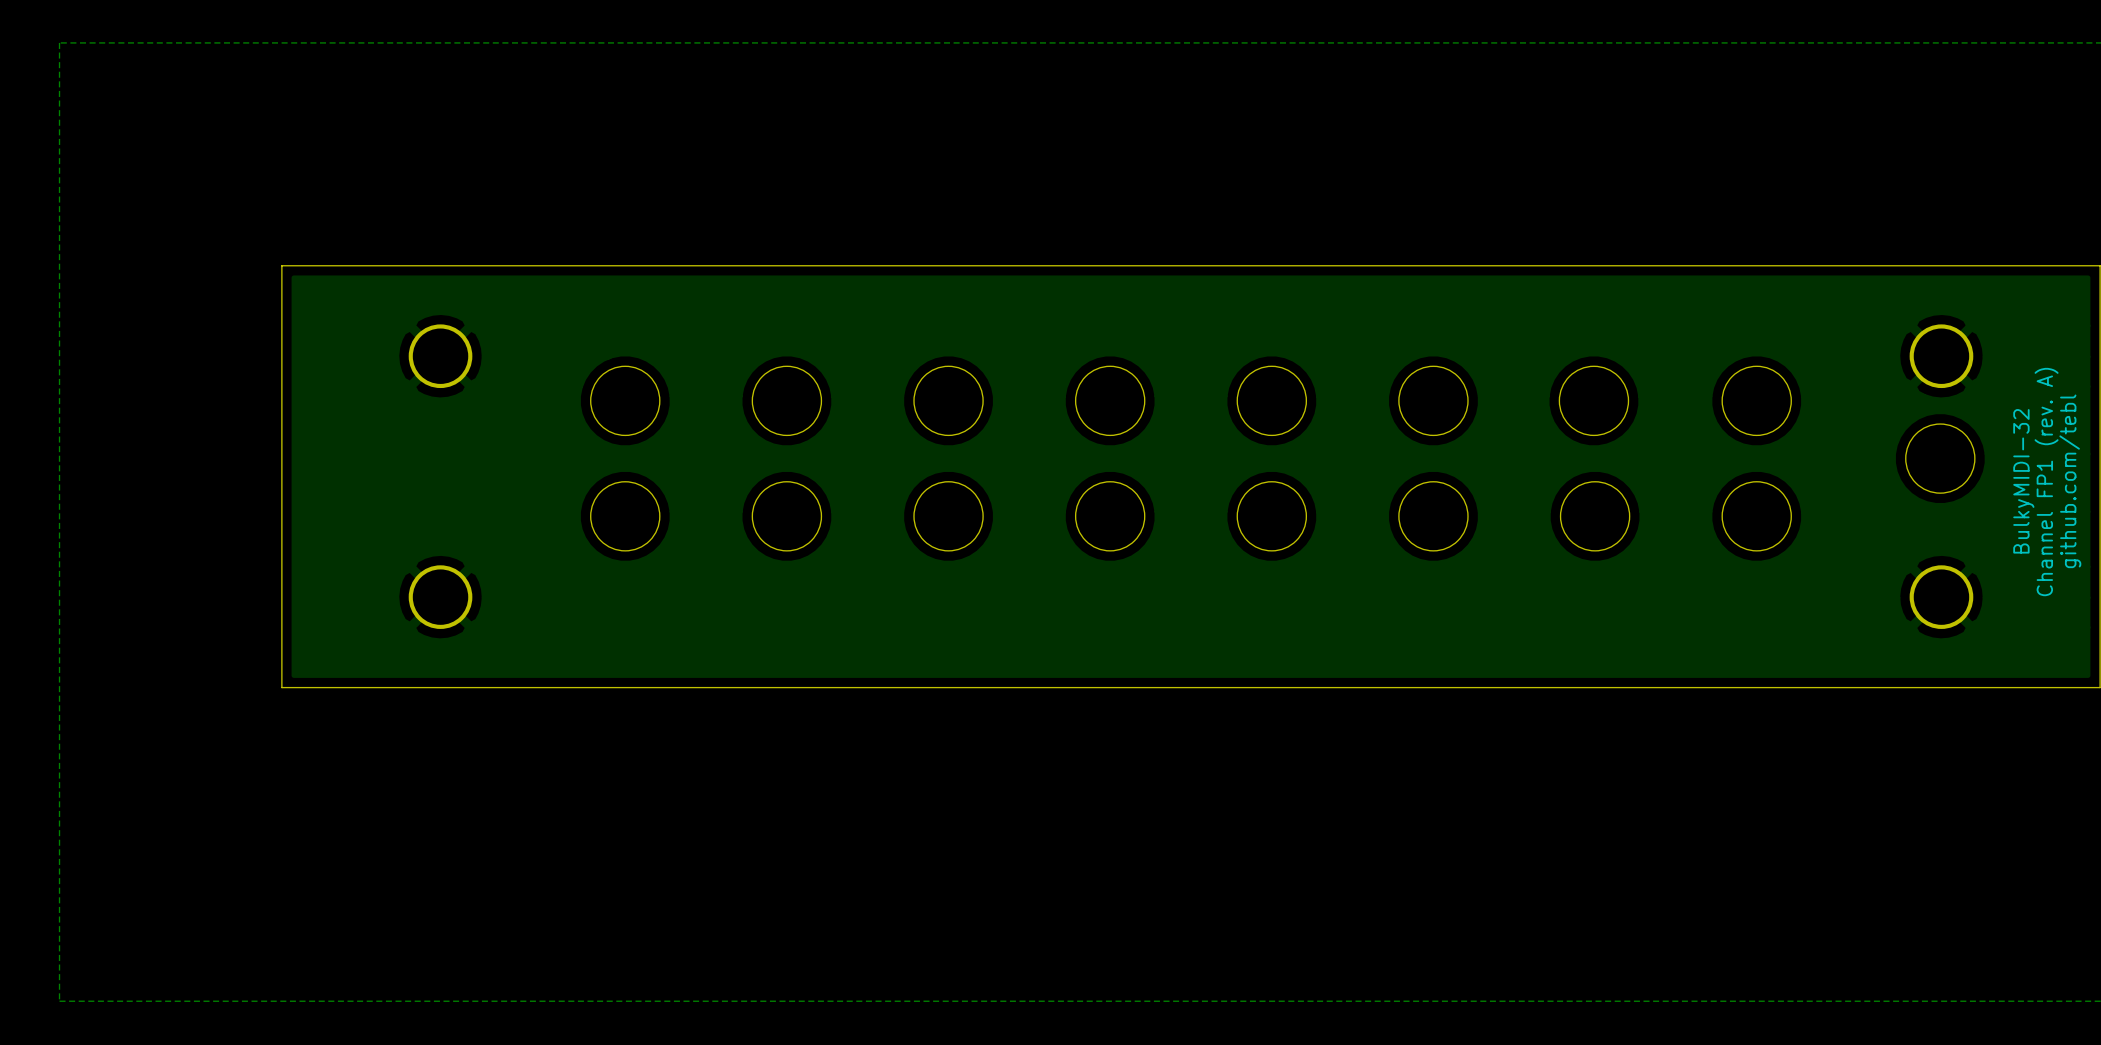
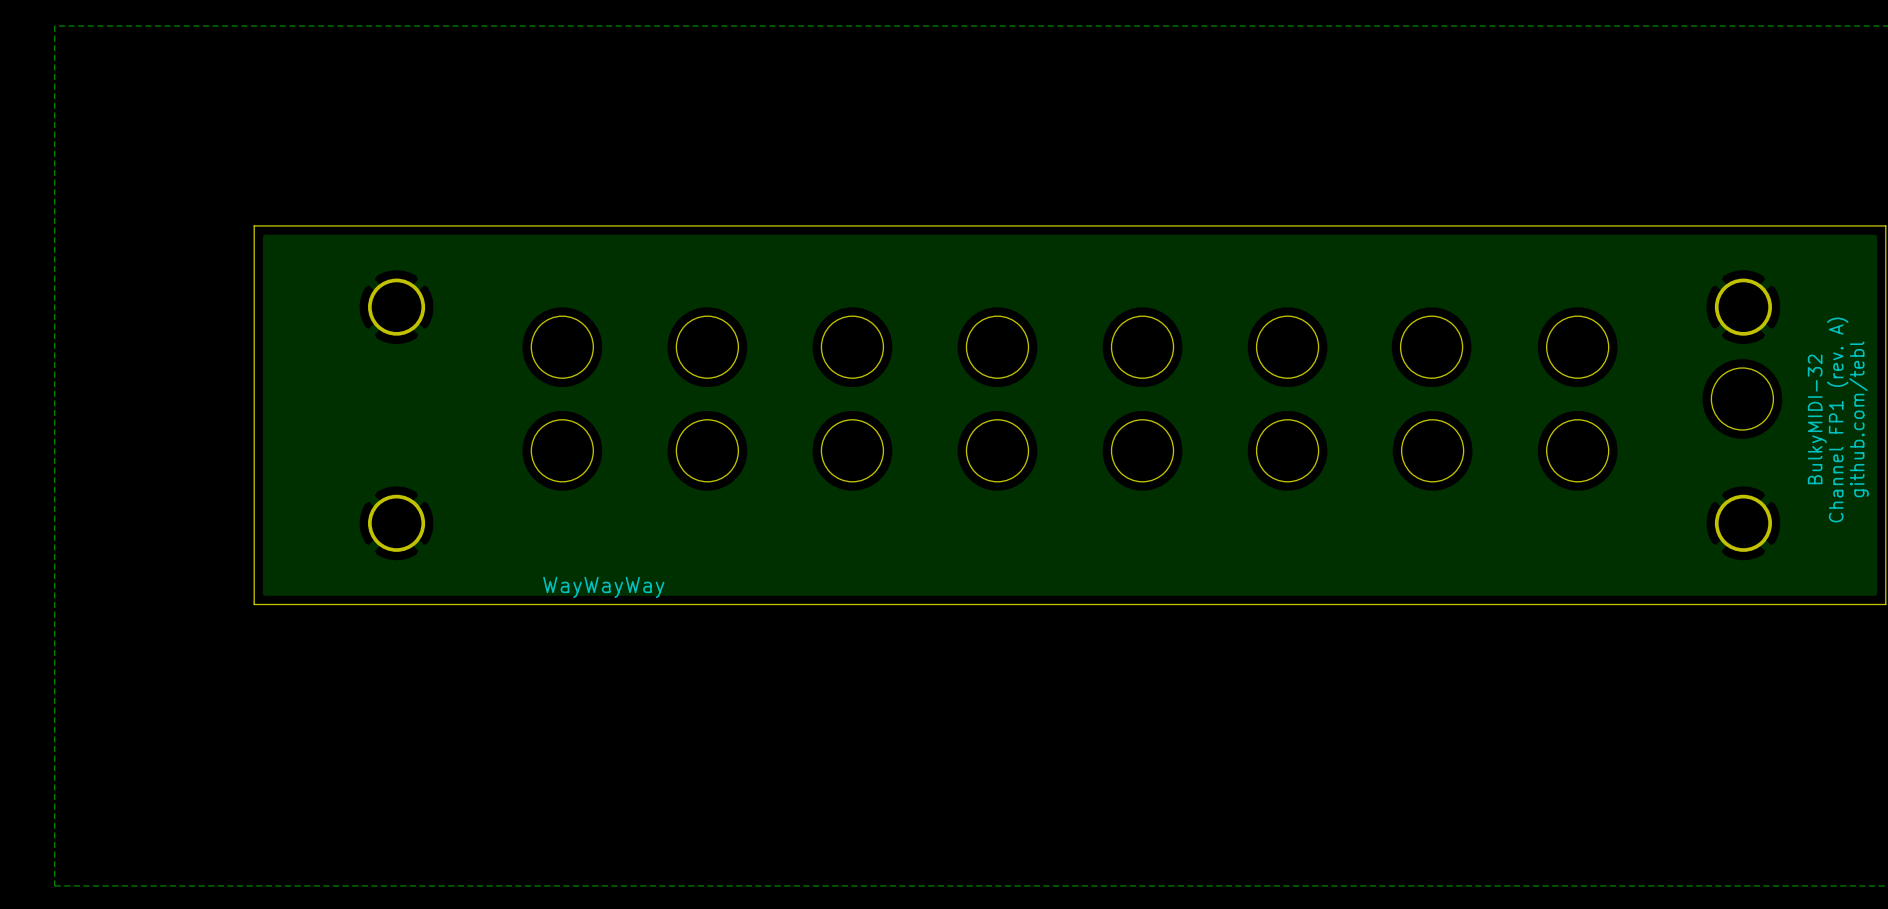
text: none -> WayWayWay (603, 587)

